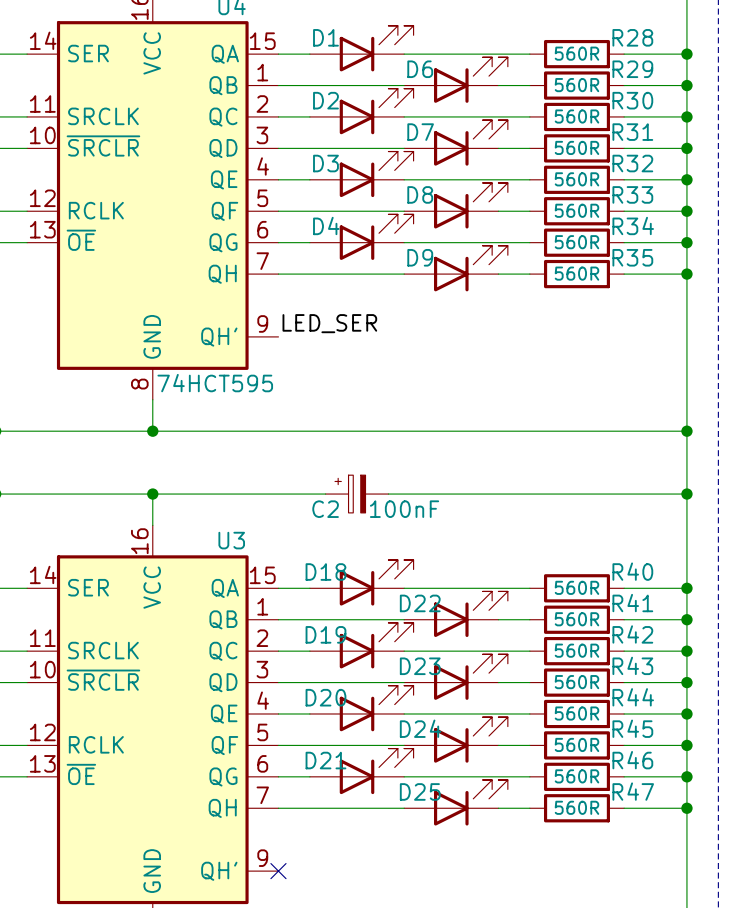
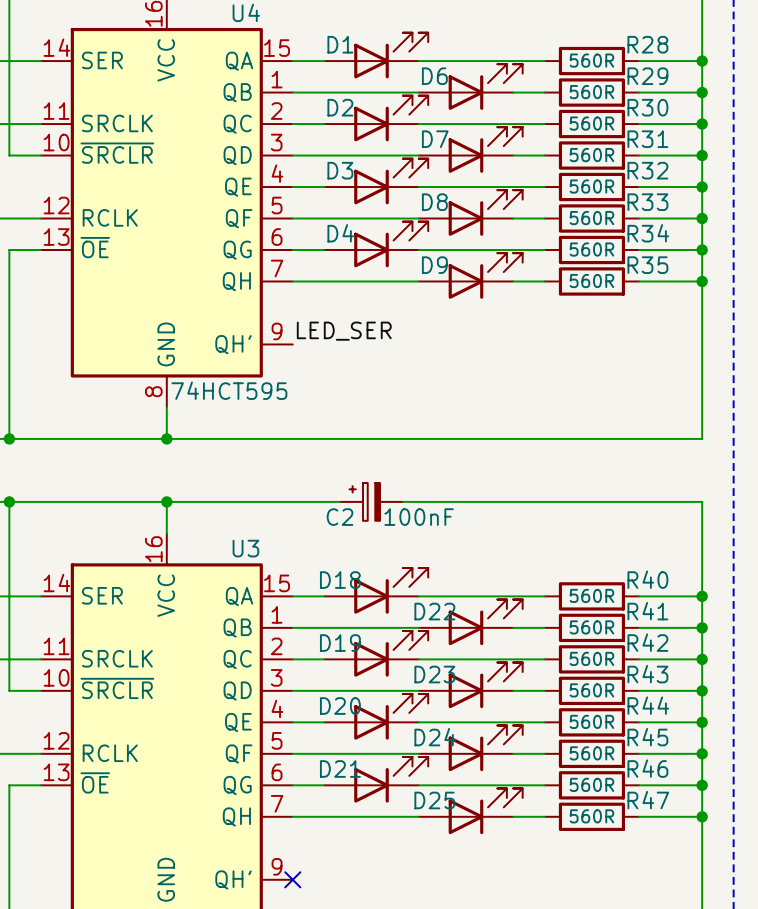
wire: (686, 431) (686, 494) -> none
junction: (686, 431) -> none
junction: (686, 494) -> none

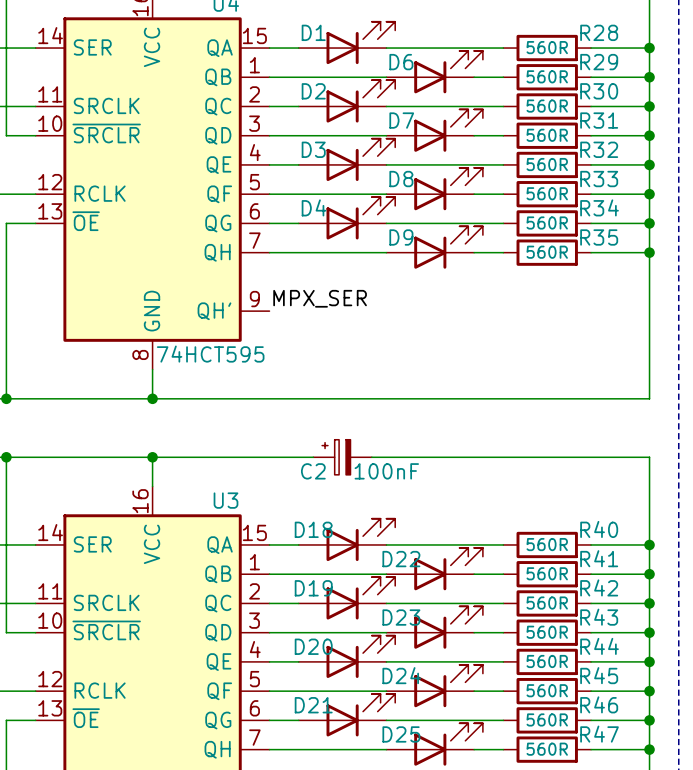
label: LED_SER (344, 331) -> MPX_SER (320, 298)

